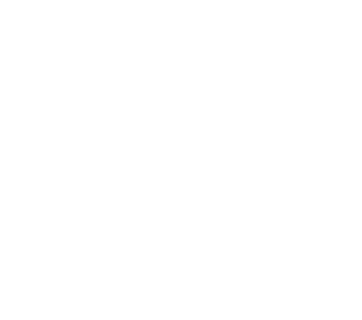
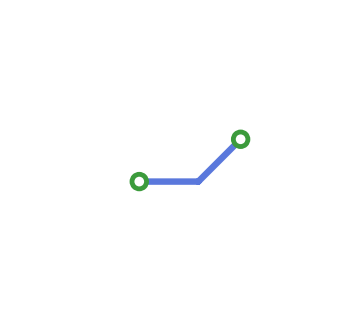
track: none -> (240, 139) (198, 181) (139, 181)
via: none -> (240, 139)
via: none -> (139, 181)

